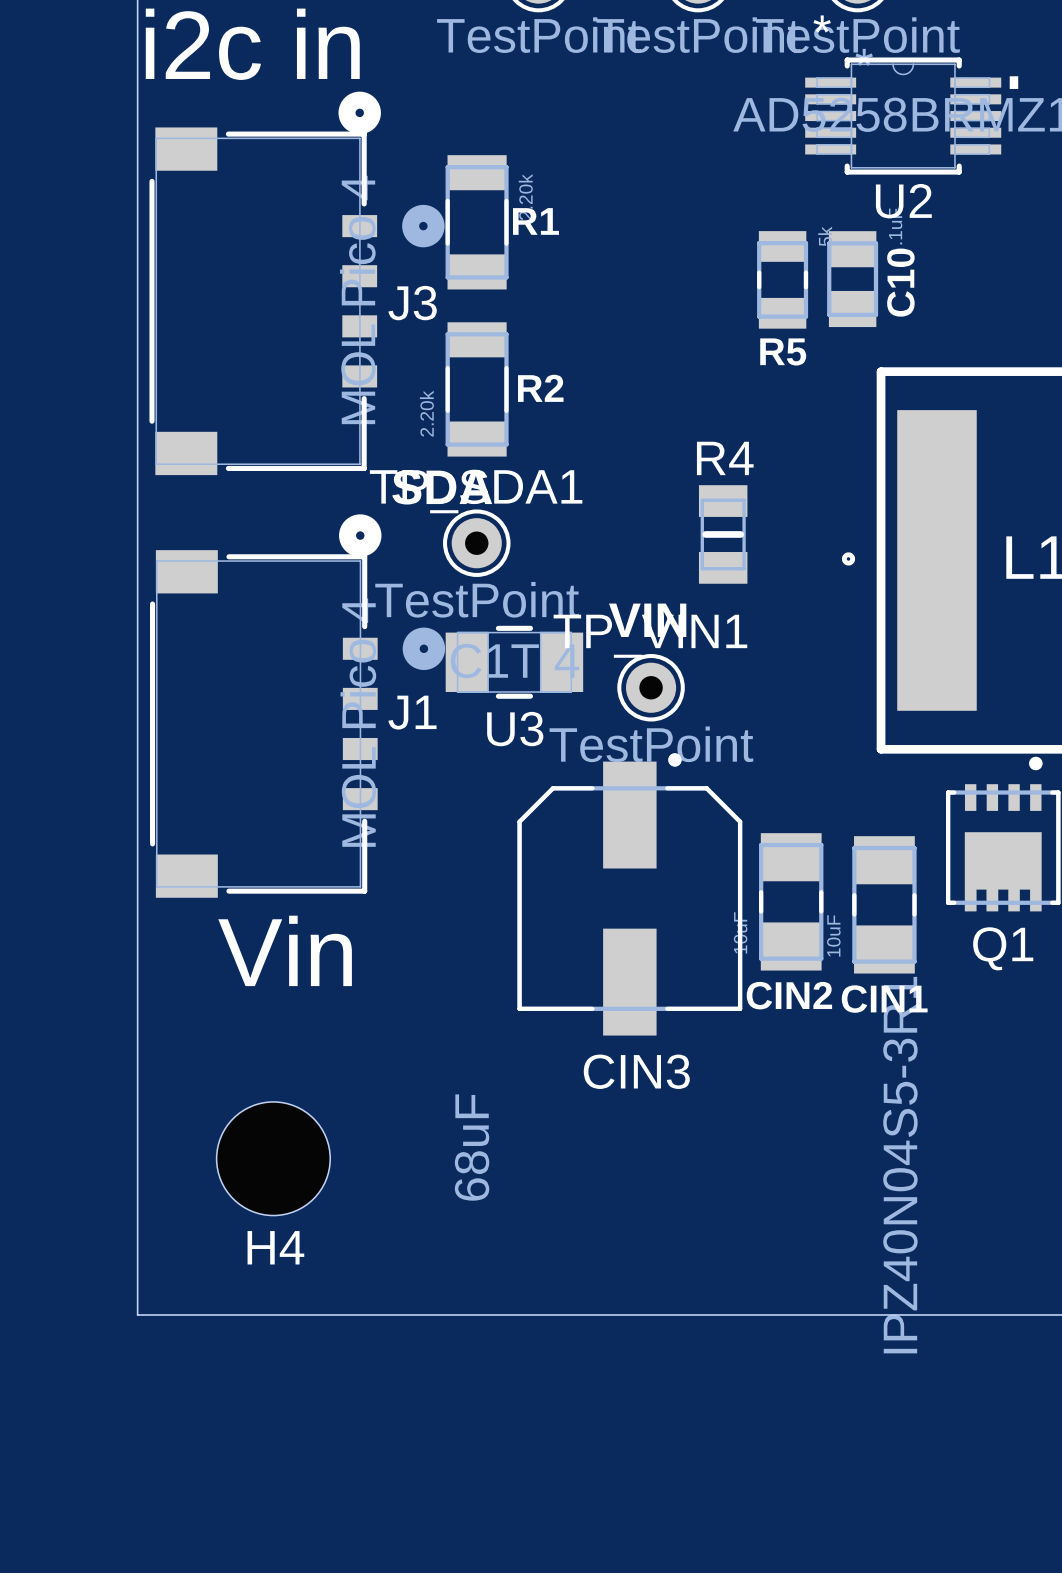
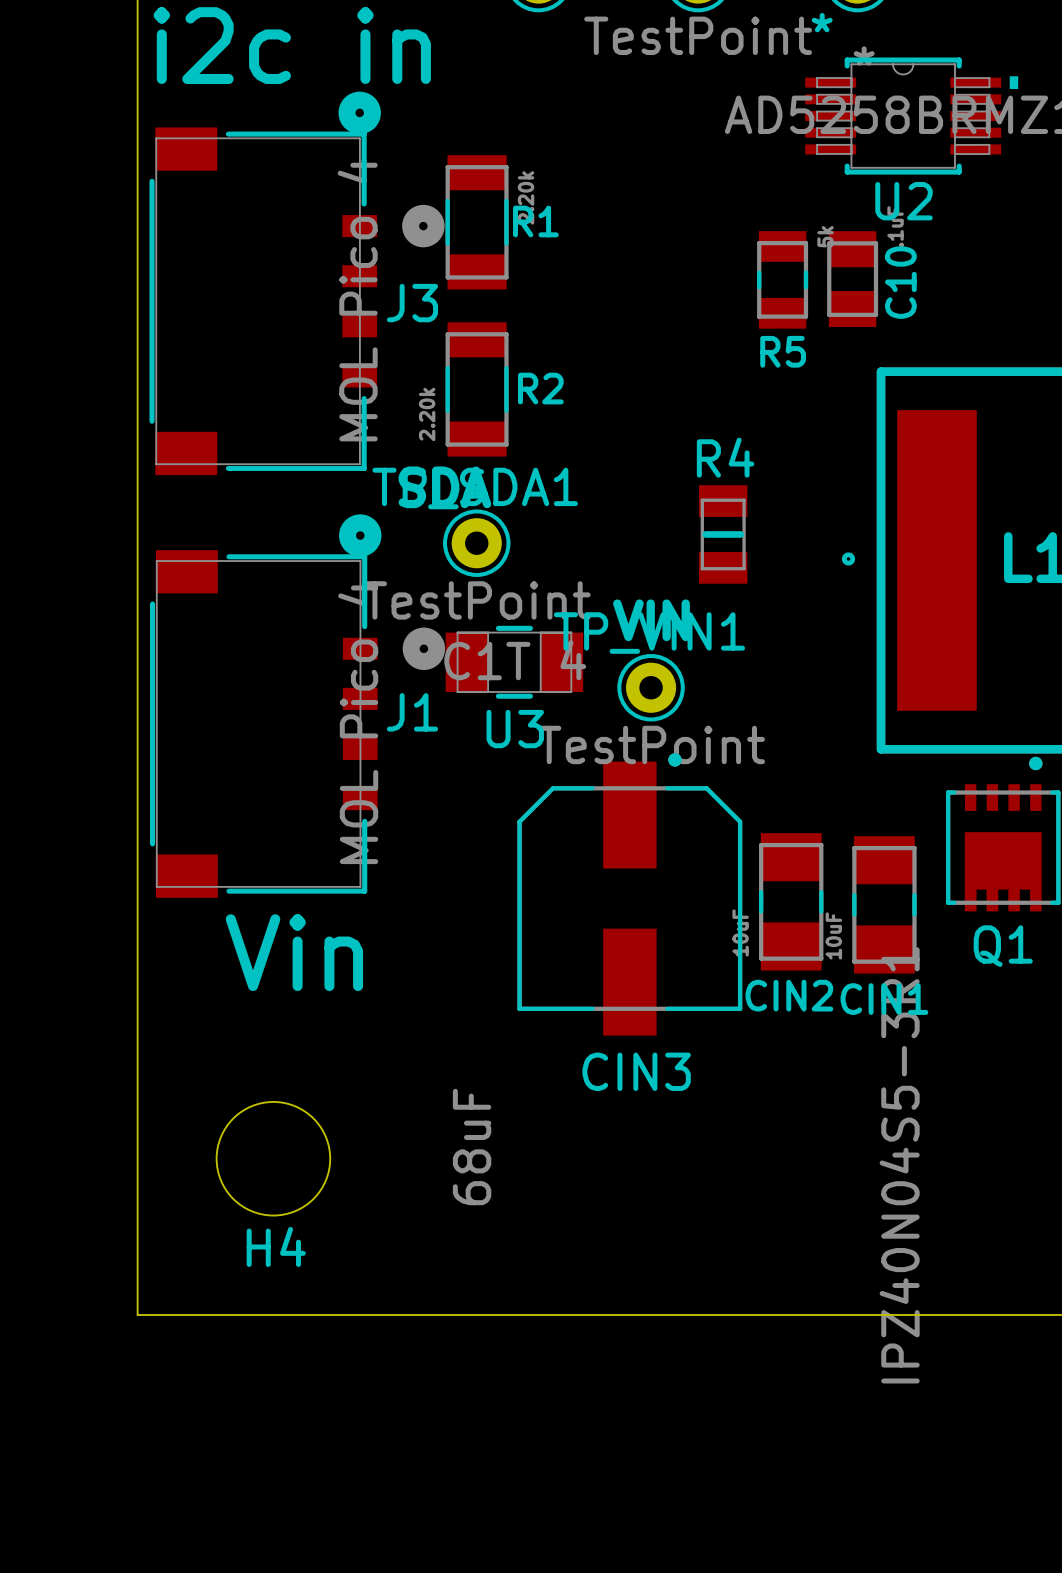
part value: TestPoint (538, 35) -> none
part value: TestPoint (858, 35) -> none

